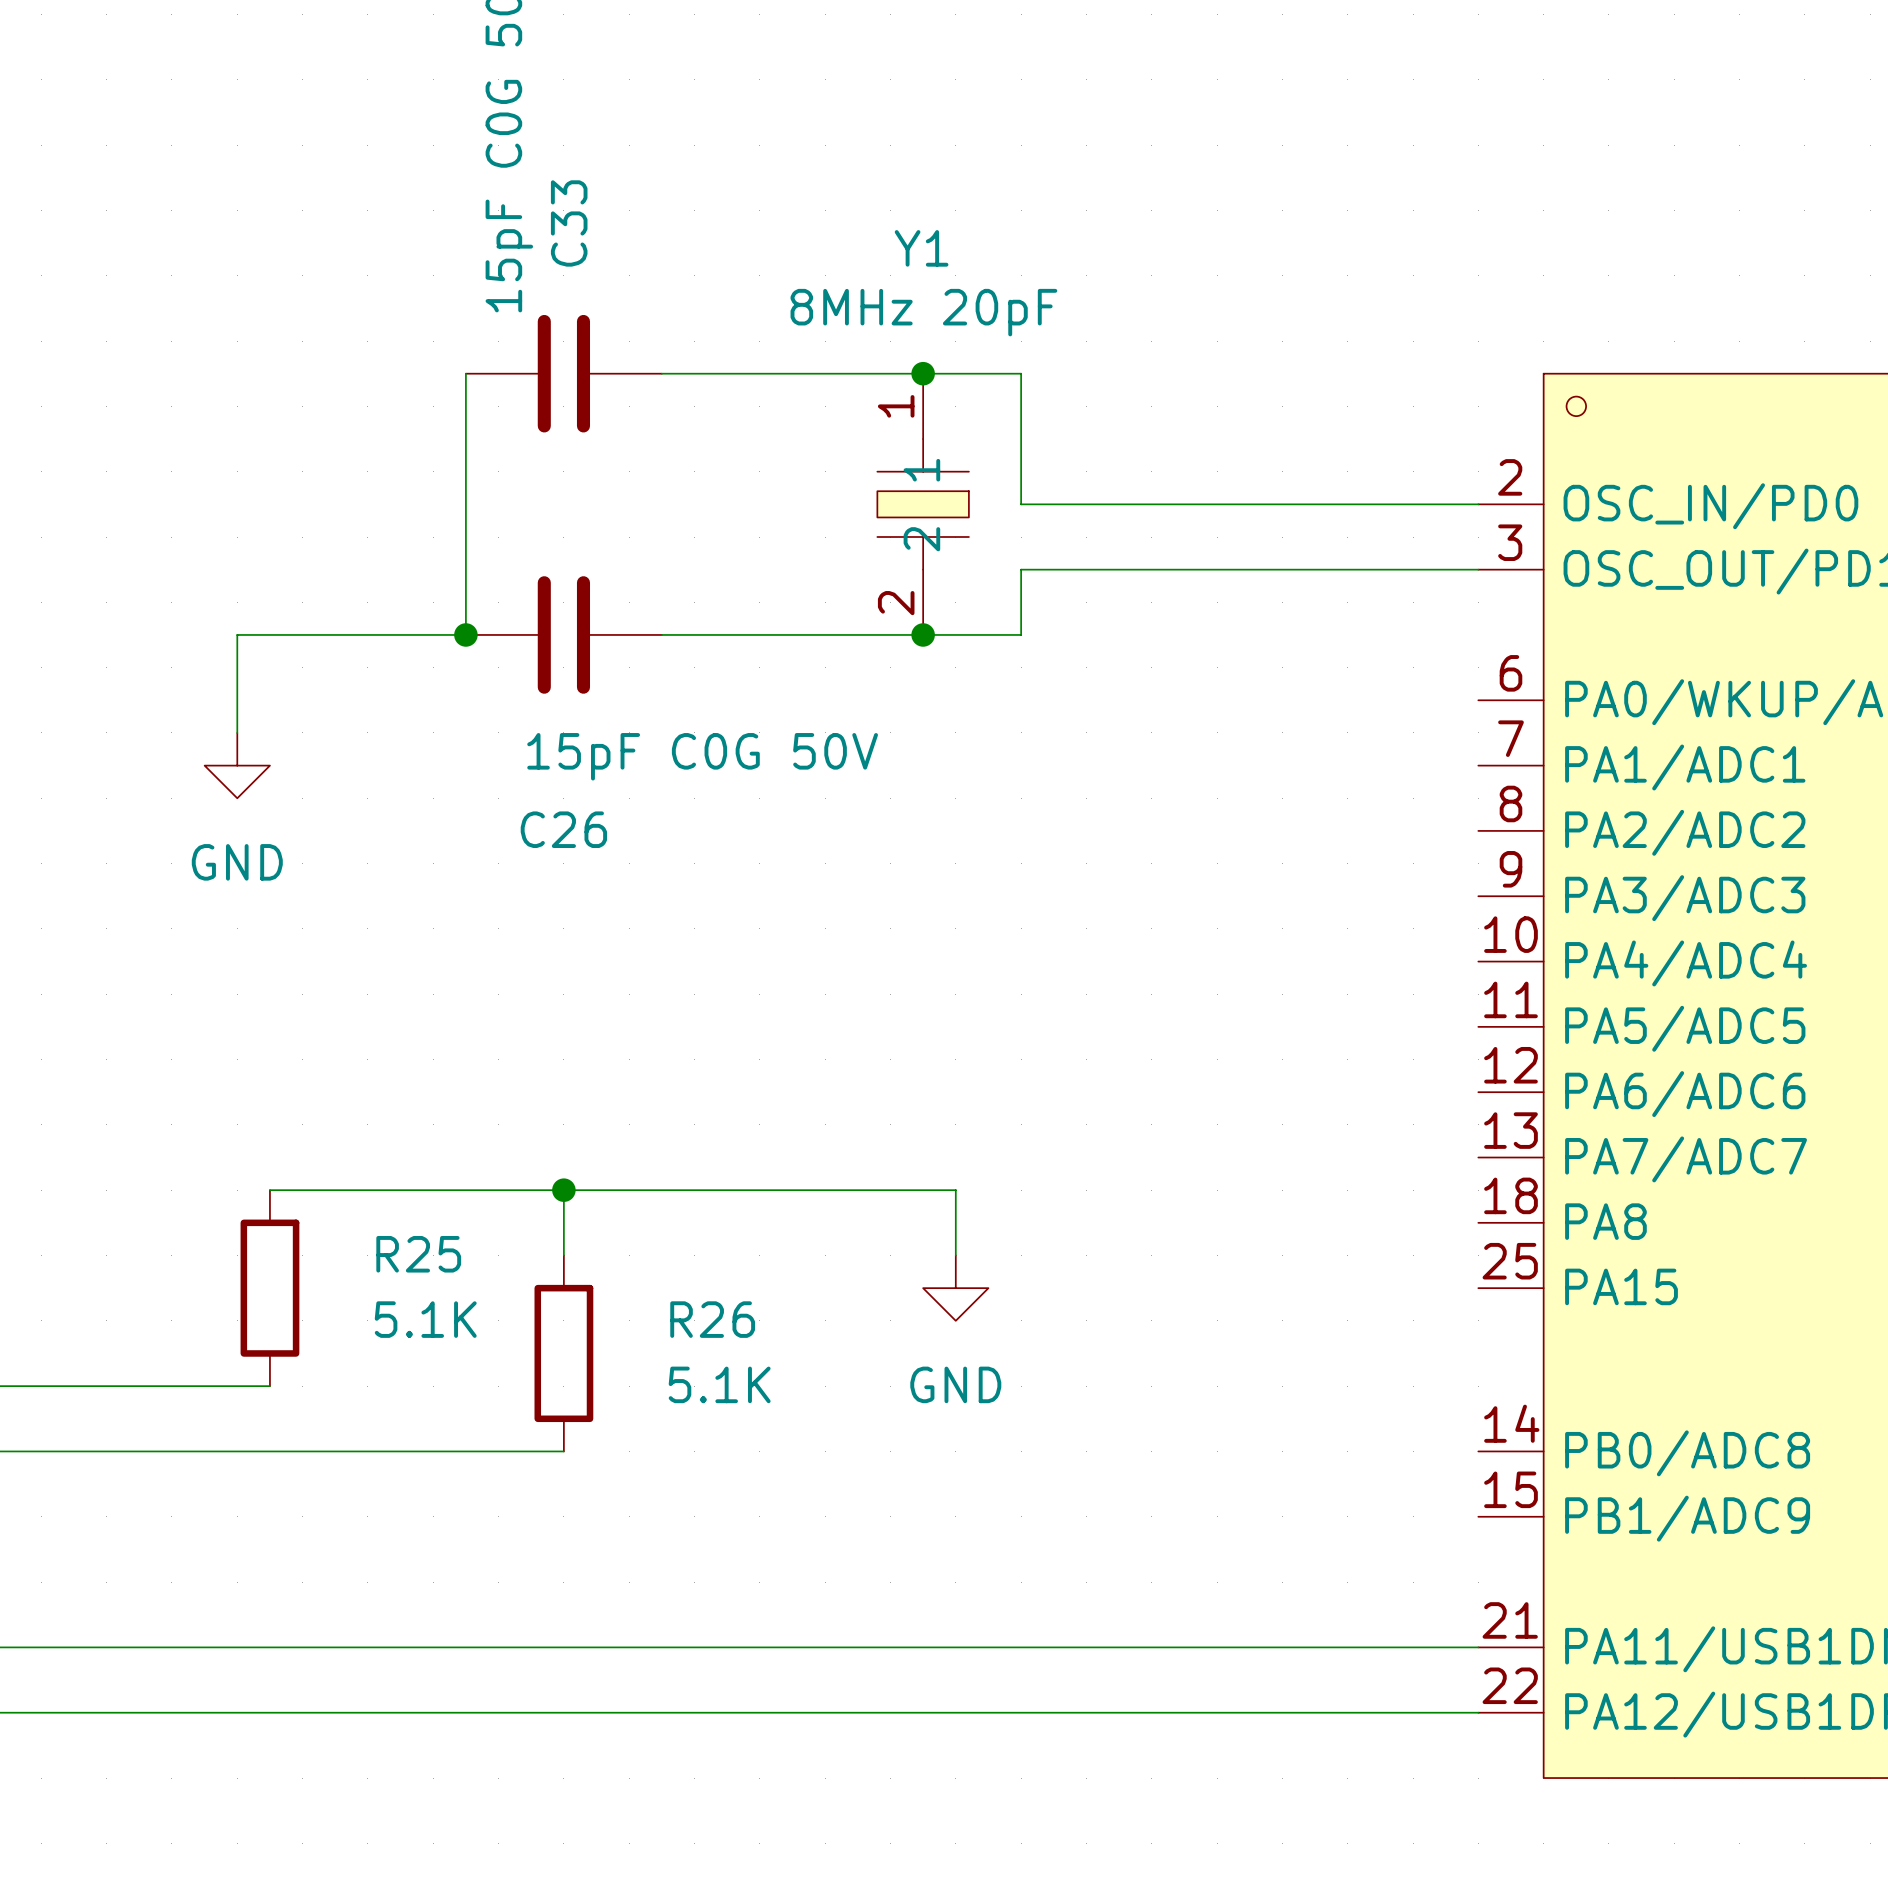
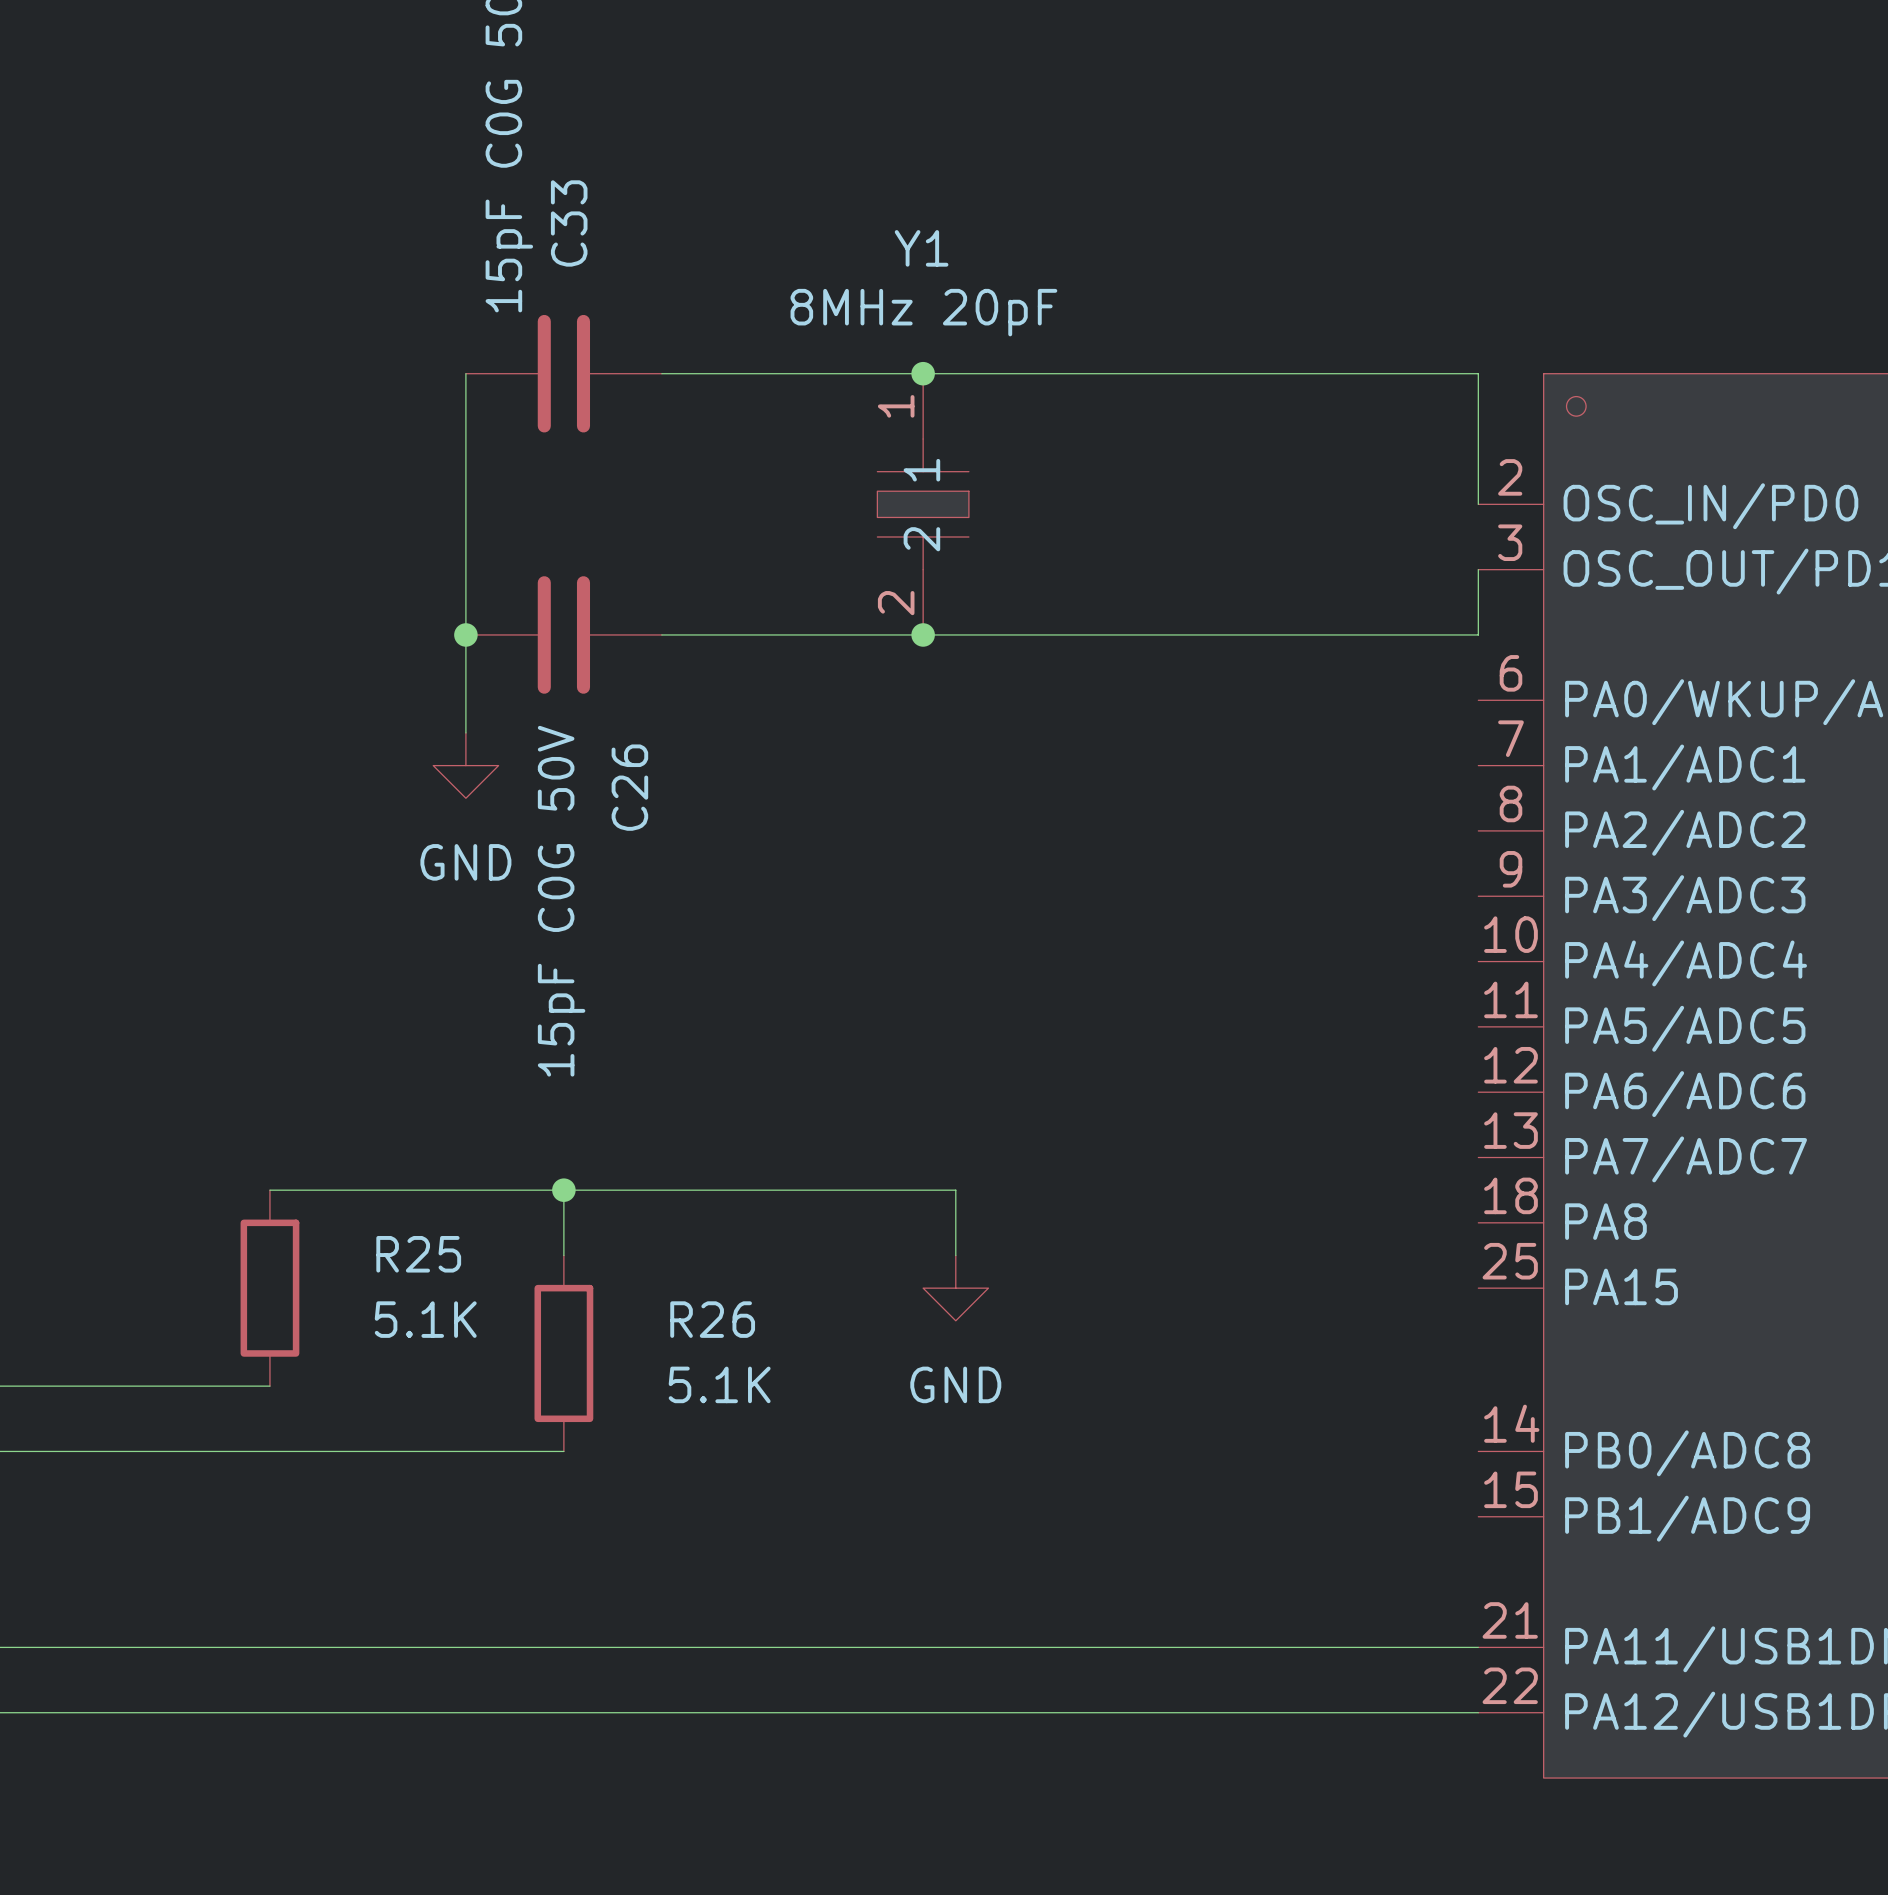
wire: (1021, 373) (1021, 504) (1478, 504) -> (1021, 373) (1478, 373) (1478, 504)
wire: (1478, 569) (1021, 569) (1021, 634) -> (1478, 569) (1478, 634) (1021, 634)
wire: (465, 634) (237, 634) (237, 732) -> (465, 634) (465, 732)
C26 value rotation: 0° (702, 756) -> 90° counterclockwise (561, 901)
power symbol position: GND (237, 765) -> GND (465, 765)
C26 name rotation: 0° (563, 829) -> 90° counterclockwise (629, 787)

